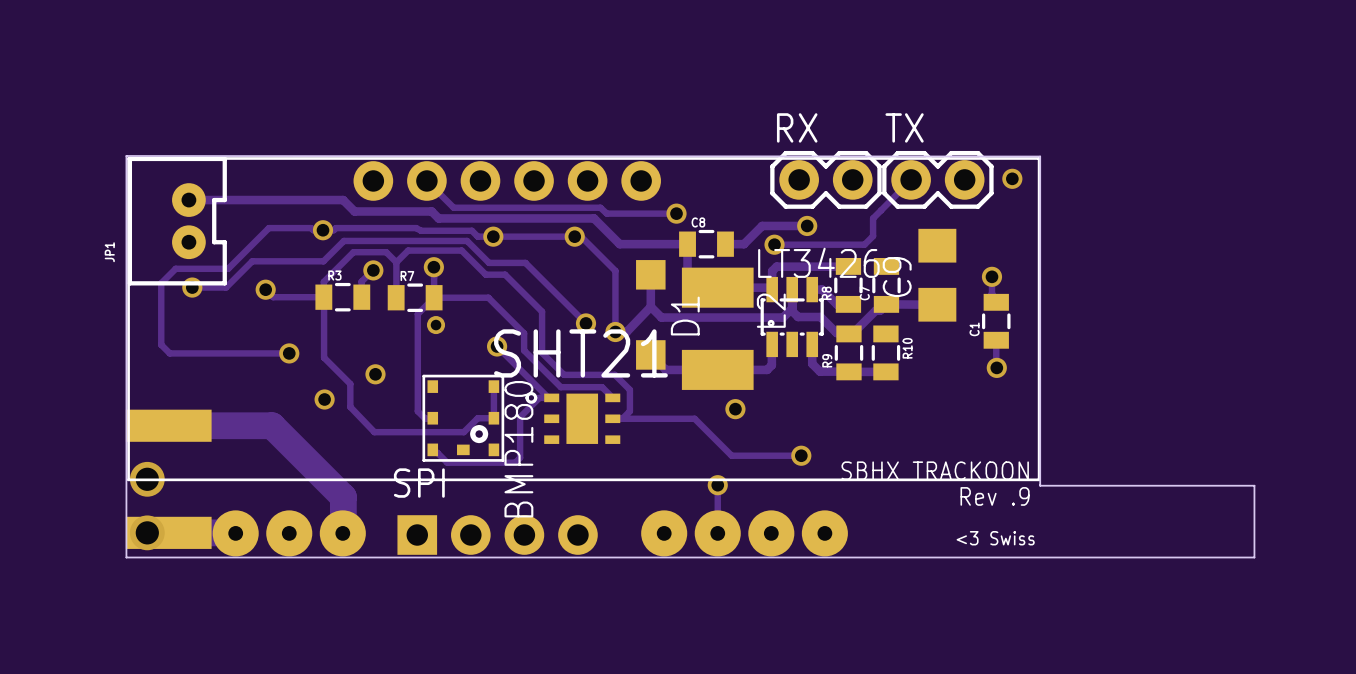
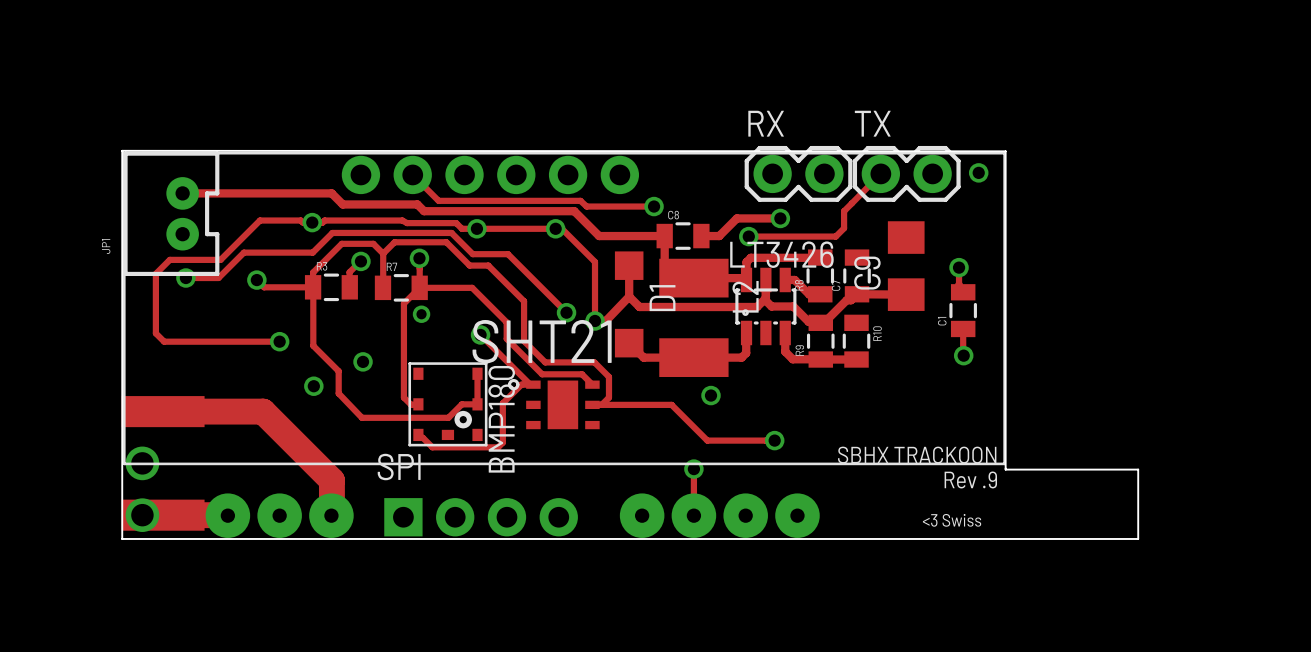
board edge: (1177, 485) (1254, 485) (1254, 557) (1177, 557) -> (1138, 469) (1138, 538)

